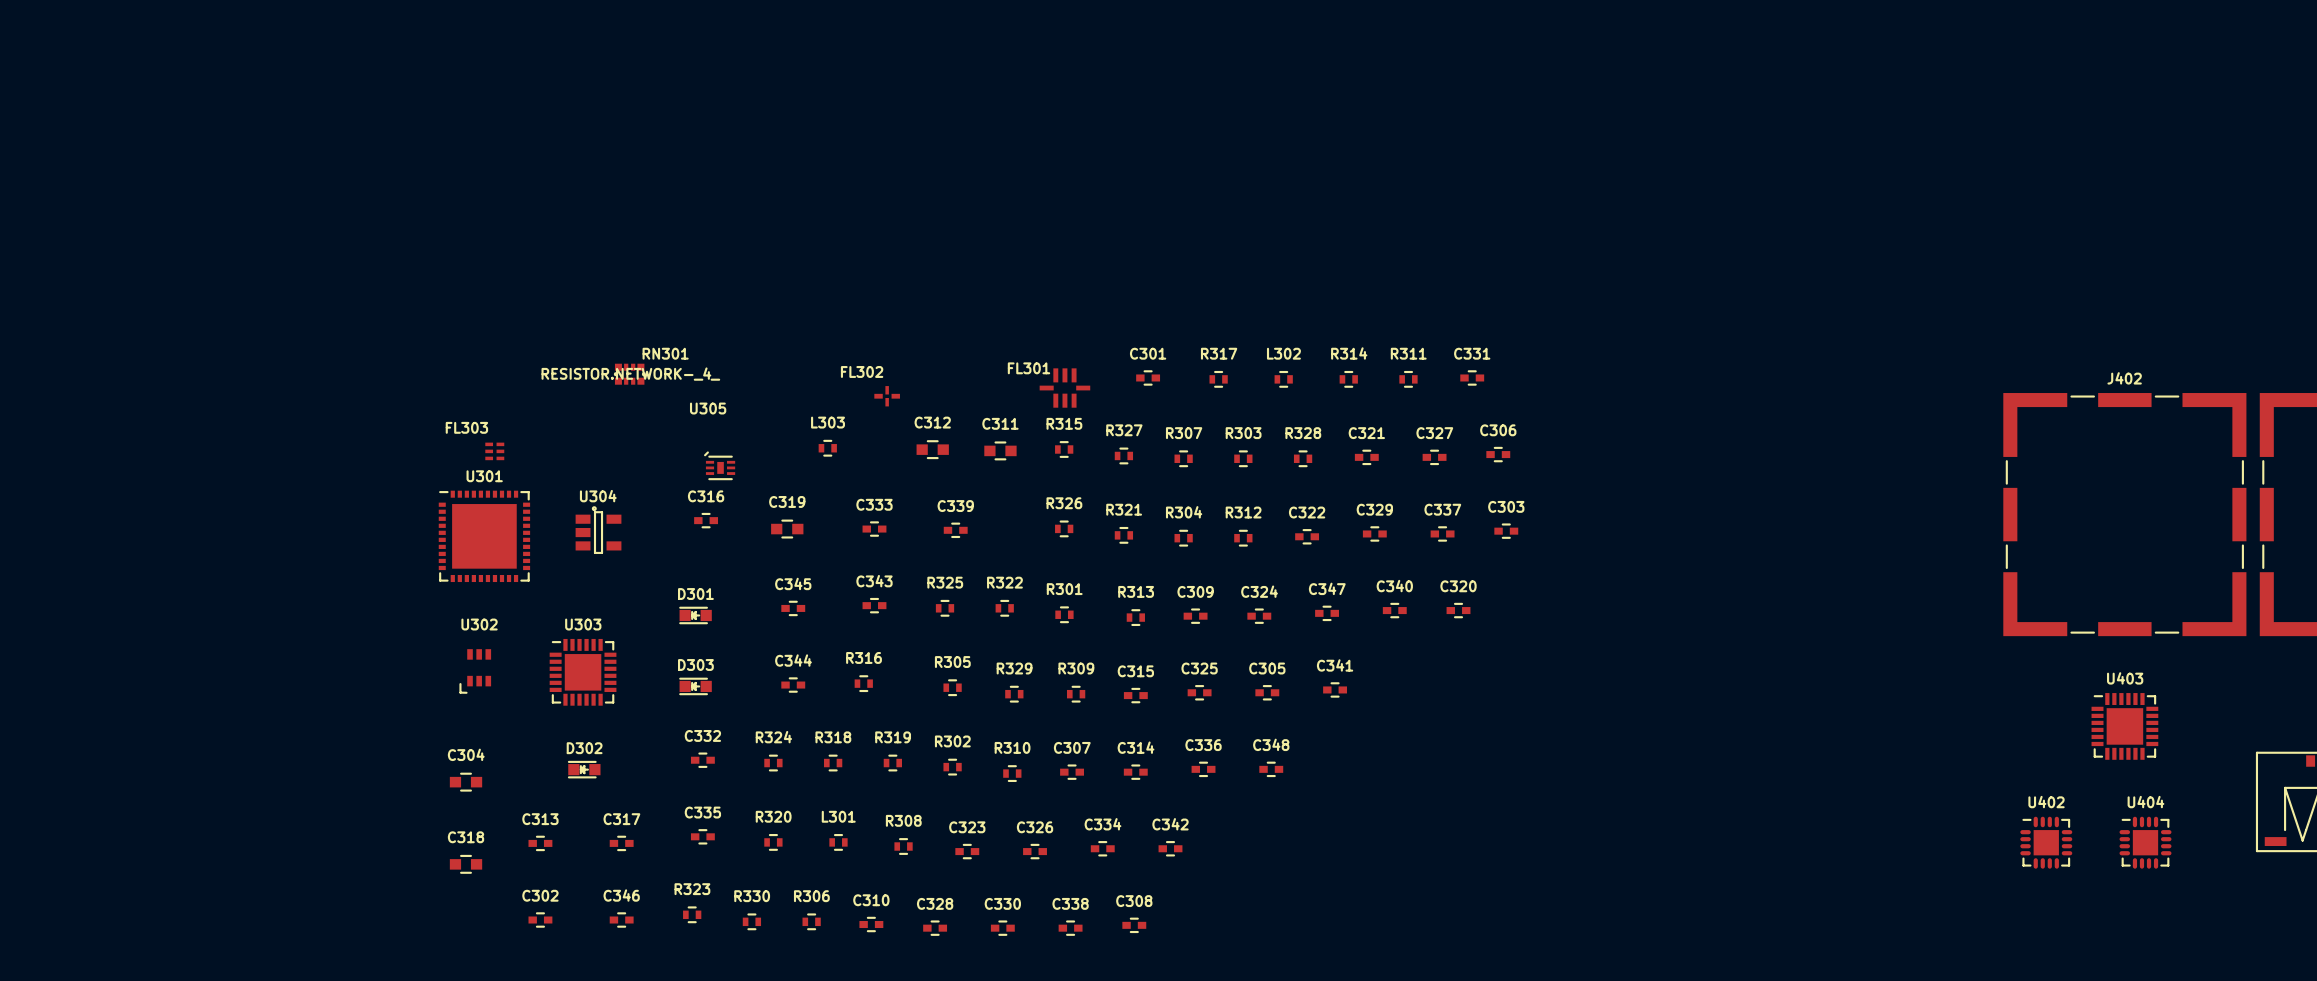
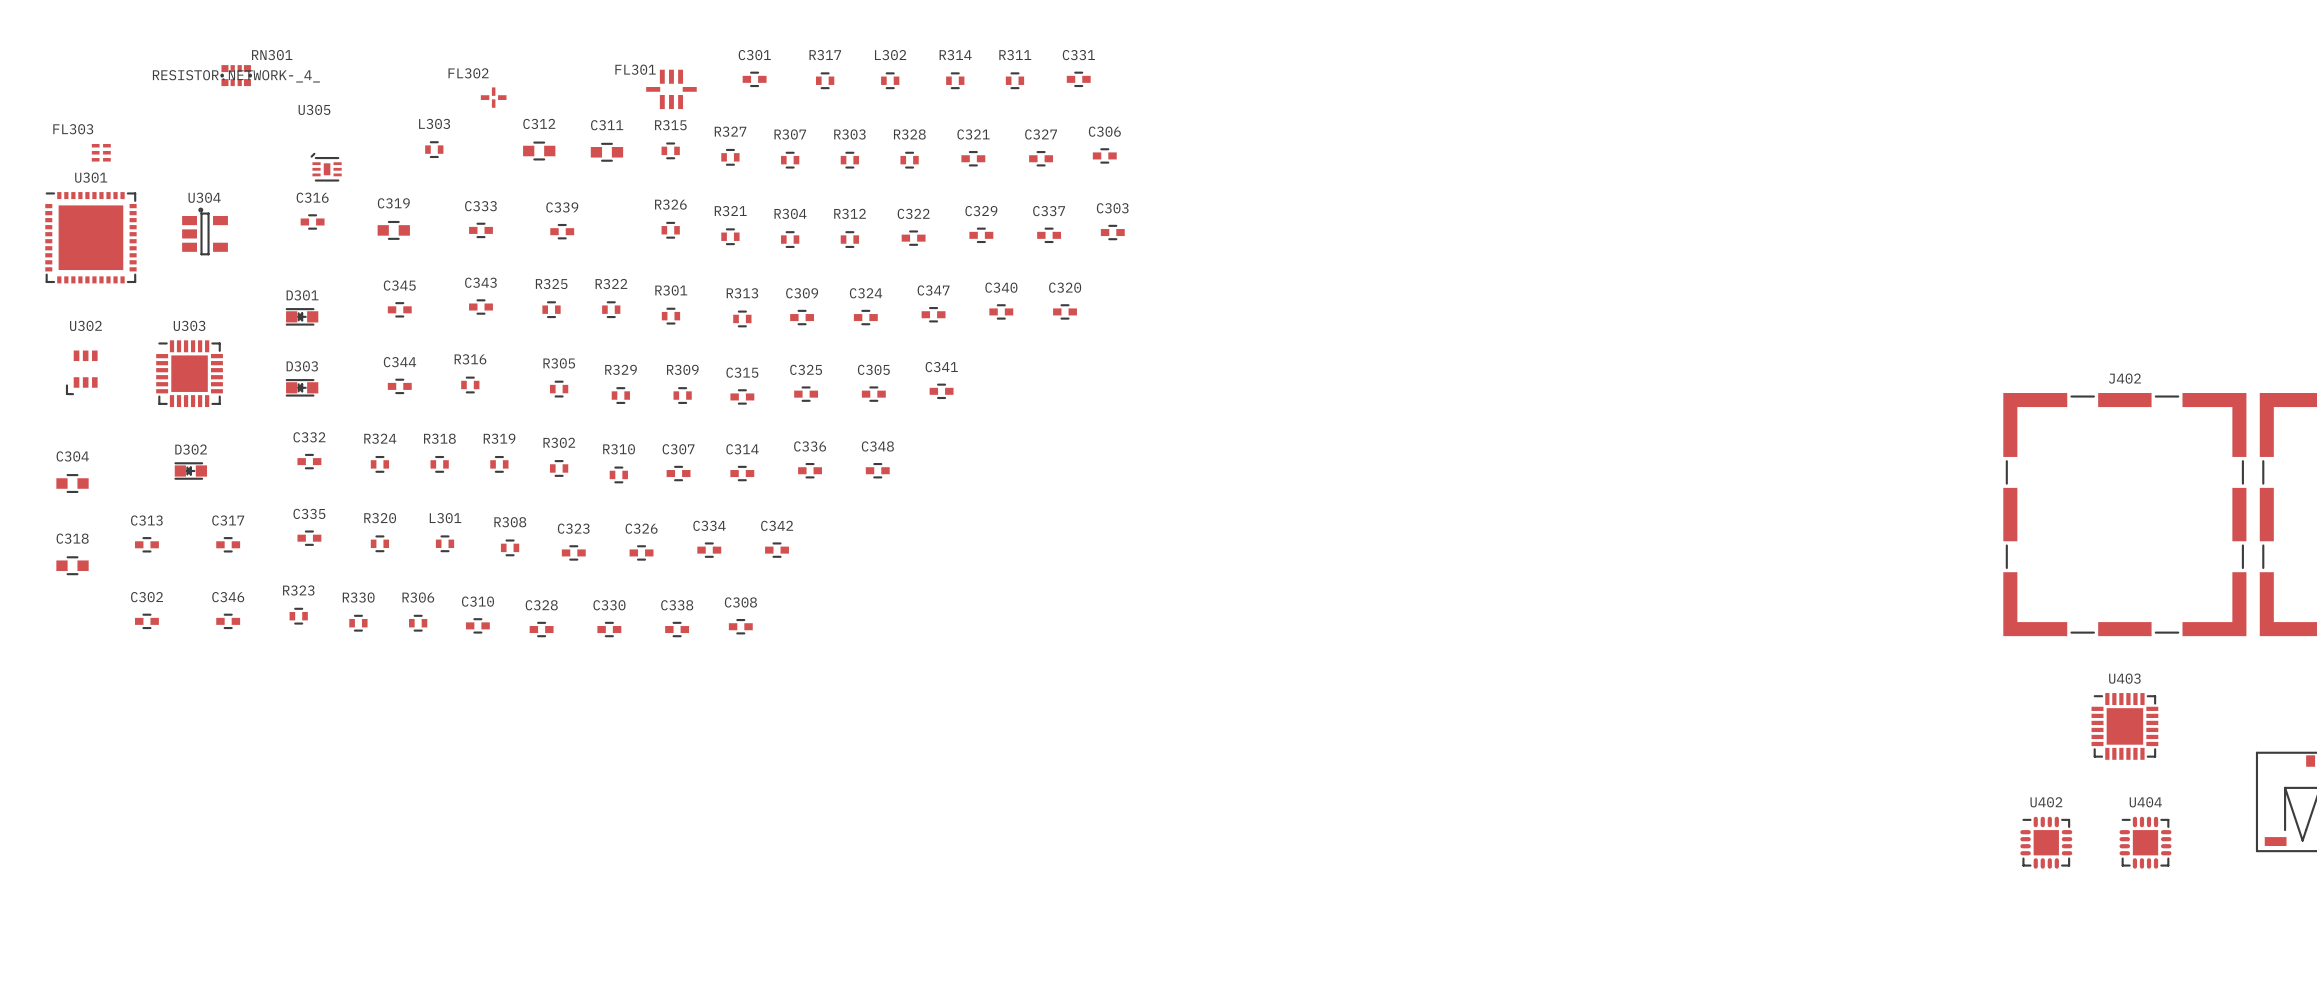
RN301 position: (629, 374) -> (236, 75)
C301 position: (1148, 377) -> (754, 79)
C331 position: (1472, 377) -> (1078, 79)
R317 position: (1218, 379) -> (825, 80)
L302 position: (1283, 379) -> (890, 80)
R314 position: (1348, 379) -> (955, 80)
R311 position: (1408, 379) -> (1014, 80)
FL301 position: (1064, 388) -> (671, 89)
FL302 position: (887, 396) -> (493, 97)
L303 position: (827, 448) -> (434, 149)
C312 position: (932, 449) -> (539, 151)
R315 position: (1064, 449) -> (670, 150)
C311 position: (1000, 450) -> (606, 152)
FL303 position: (494, 451) -> (101, 152)
C306 position: (1498, 454) -> (1104, 155)
R327 position: (1123, 455) -> (730, 157)
C321 position: (1366, 457) -> (973, 158)
C327 position: (1434, 457) -> (1041, 158)
R307 position: (1183, 458) -> (790, 160)
R303 position: (1243, 458) -> (849, 160)
R328 position: (1303, 458) -> (909, 160)
U305 position: (719, 465) -> (326, 167)
C316 position: (706, 520) -> (312, 221)
R326 position: (1064, 528) -> (670, 230)
C319 position: (787, 529) -> (393, 230)
C333 position: (874, 529) -> (480, 230)
U304 position: (598, 530) -> (205, 231)
C339 position: (955, 530) -> (562, 231)
C303 position: (1506, 531) -> (1112, 232)
C329 position: (1374, 533) -> (981, 235)
C337 position: (1442, 533) -> (1049, 235)
R321 position: (1123, 535) -> (730, 236)
U301 position: (484, 536) -> (90, 237)
C322 position: (1307, 536) -> (913, 238)
R304 position: (1183, 538) -> (790, 239)
R312 position: (1243, 538) -> (849, 239)
C343 position: (874, 605) -> (480, 307)
C345 position: (793, 608) -> (399, 309)
R325 position: (945, 608) -> (551, 309)
R322 position: (1004, 608) -> (611, 309)
C340 position: (1394, 610) -> (1001, 311)
C320 position: (1458, 610) -> (1065, 311)
C347 position: (1327, 613) -> (933, 314)
R301 position: (1064, 614) -> (670, 316)
D301 position: (695, 615) -> (302, 316)
C309 position: (1195, 616) -> (802, 317)
C324 position: (1259, 616) -> (865, 317)
R313 position: (1135, 617) -> (742, 318)
U302 position: (475, 671) -> (81, 372)
U303 position: (583, 672) -> (189, 373)
R316 position: (863, 683) -> (470, 385)
C344 position: (793, 685) -> (399, 386)
D303 position: (695, 686) -> (302, 387)
R305 position: (952, 687) -> (559, 389)
C341 position: (1335, 689) -> (941, 391)
C325 position: (1199, 692) -> (806, 394)
C305 position: (1267, 692) -> (873, 394)
R329 position: (1014, 694) -> (620, 395)
R309 position: (1076, 694) -> (682, 395)
C315 position: (1135, 695) -> (742, 396)
C332 position: (702, 760) -> (309, 461)
R324 position: (773, 763) -> (379, 464)
R318 position: (833, 763) -> (439, 464)
R319 position: (892, 763) -> (499, 464)
R302 position: (952, 767) -> (559, 468)
D302 position: (584, 769) -> (190, 471)
C336 position: (1203, 769) -> (810, 470)
C348 position: (1271, 769) -> (877, 470)
C307 position: (1072, 772) -> (678, 473)
C314 position: (1135, 772) -> (742, 473)
R310 position: (1012, 773) -> (618, 474)
C304 position: (466, 782) -> (72, 483)
C335 position: (702, 836) -> (309, 538)
R320 position: (773, 842) -> (379, 543)
L301 position: (838, 842) -> (445, 543)
C313 position: (540, 843) -> (146, 544)
C317 position: (621, 843) -> (228, 544)
R308 position: (903, 846) -> (510, 547)
C334 position: (1102, 848) -> (709, 550)
C342 position: (1170, 848) -> (777, 550)
C323 position: (967, 851) -> (573, 552)
C326 position: (1035, 851) -> (641, 552)
C318 position: (466, 864) -> (72, 565)
R323 position: (692, 914) -> (298, 616)
C302 position: (540, 920) -> (146, 621)
C346 position: (621, 920) -> (228, 621)
R330 position: (751, 921) -> (358, 623)
R306 position: (811, 921) -> (418, 623)
C310 position: (871, 924) -> (477, 625)
C308 position: (1134, 925) -> (740, 626)
C328 position: (935, 928) -> (541, 629)
C330 position: (1002, 928) -> (609, 629)
C338 position: (1070, 928) -> (677, 629)

